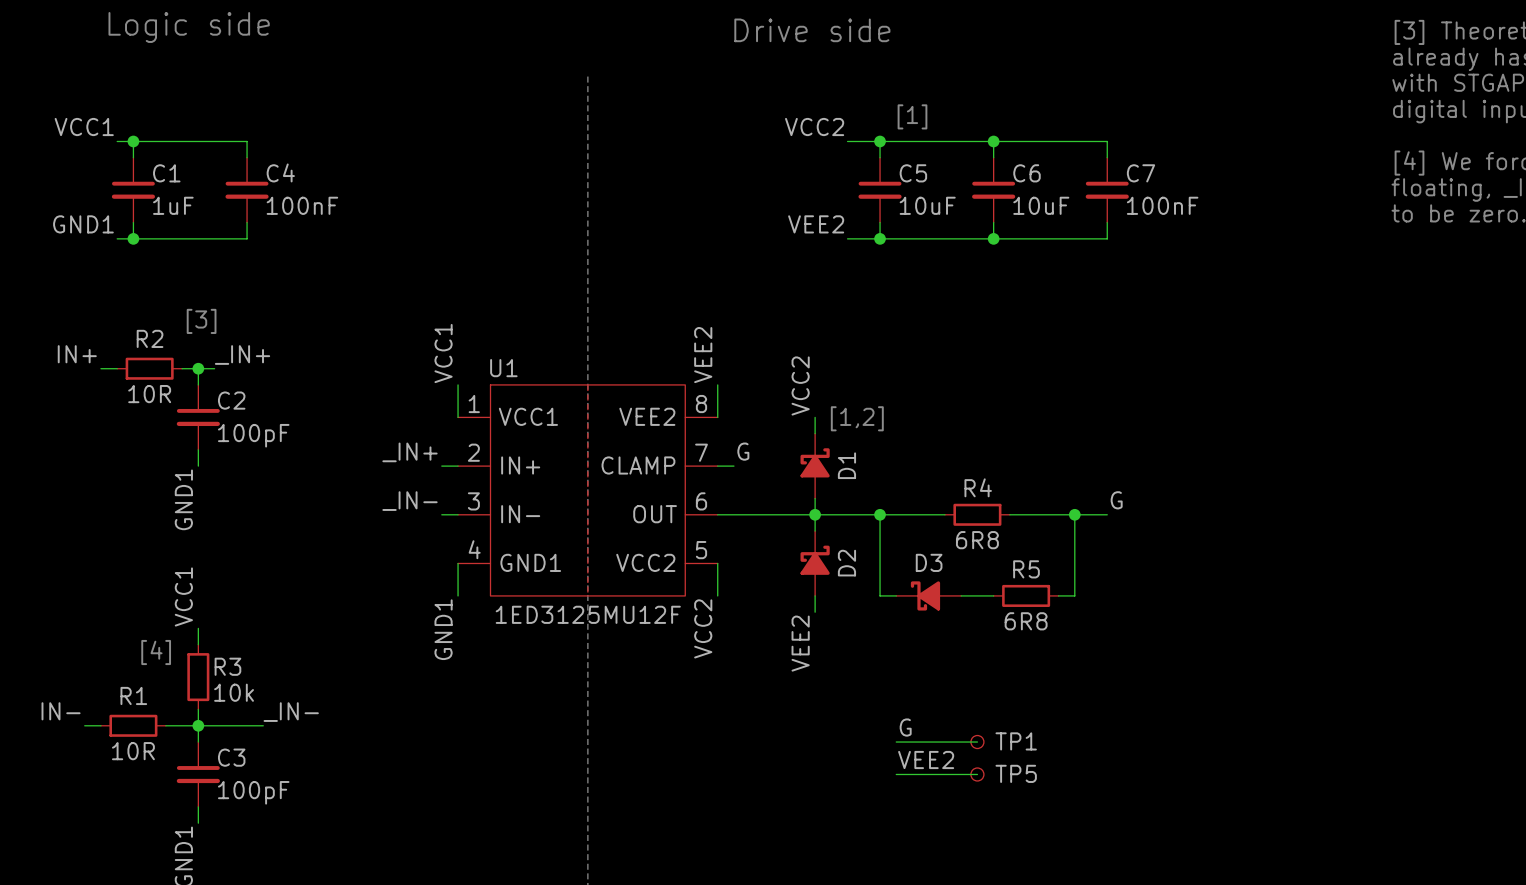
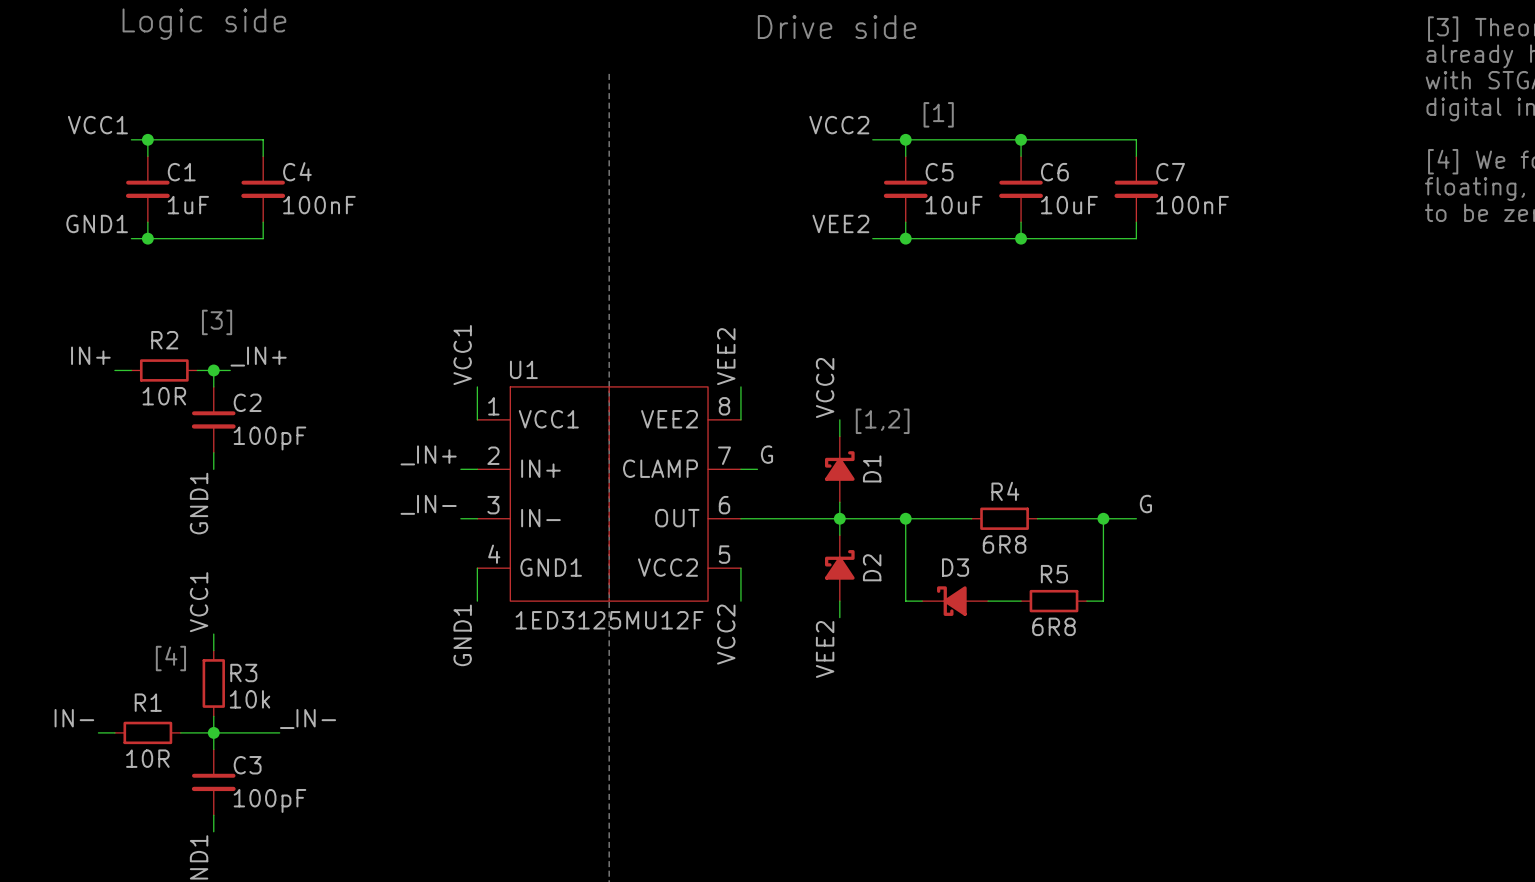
label: G (905, 727) -> none
wire: (896, 742) (977, 742) -> none
TP1: (977, 742) -> none
label: VEE2 (926, 760) -> none
wire: (896, 774) (977, 774) -> none
TP5: (977, 774) -> none

